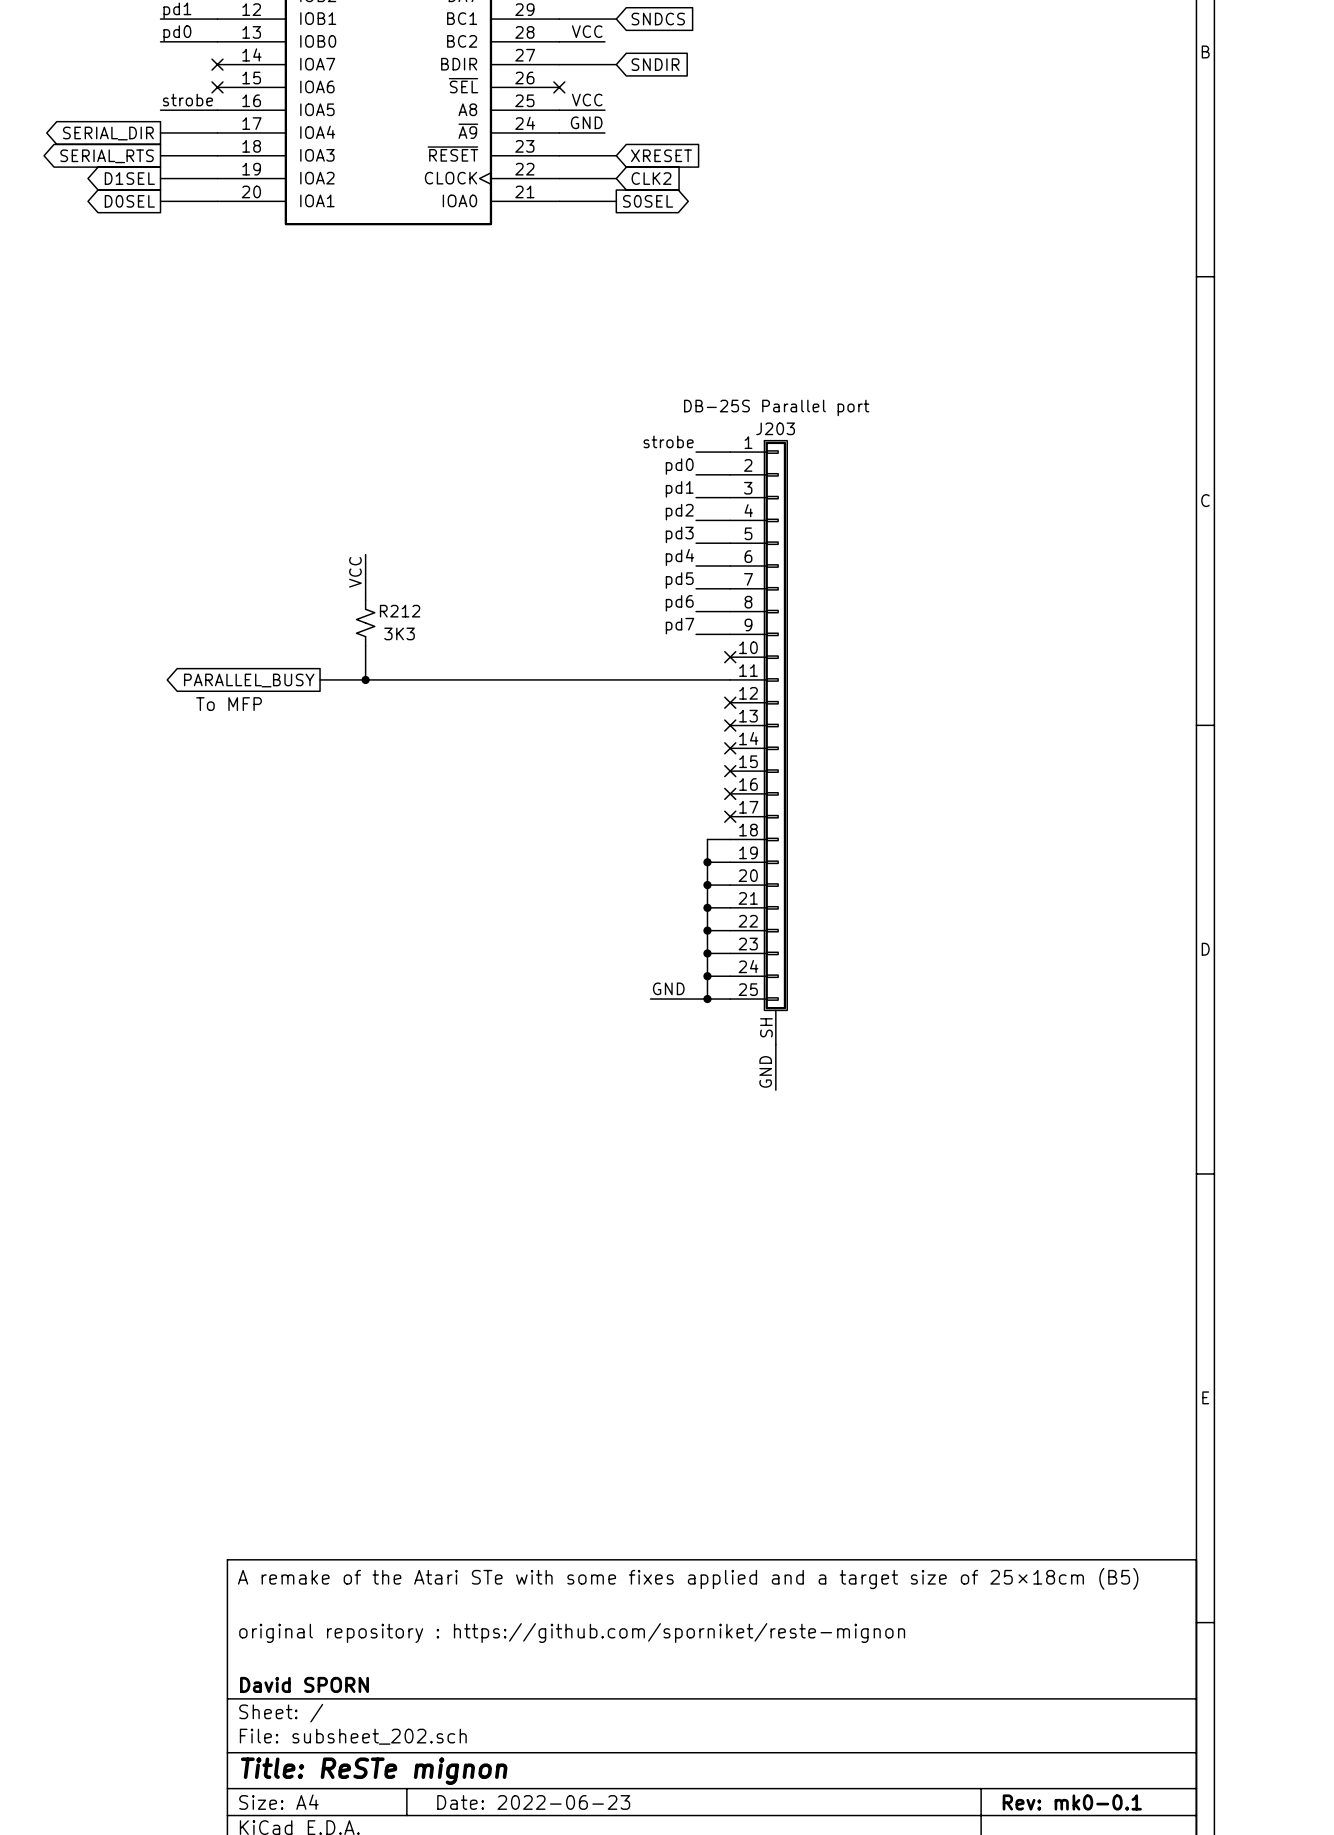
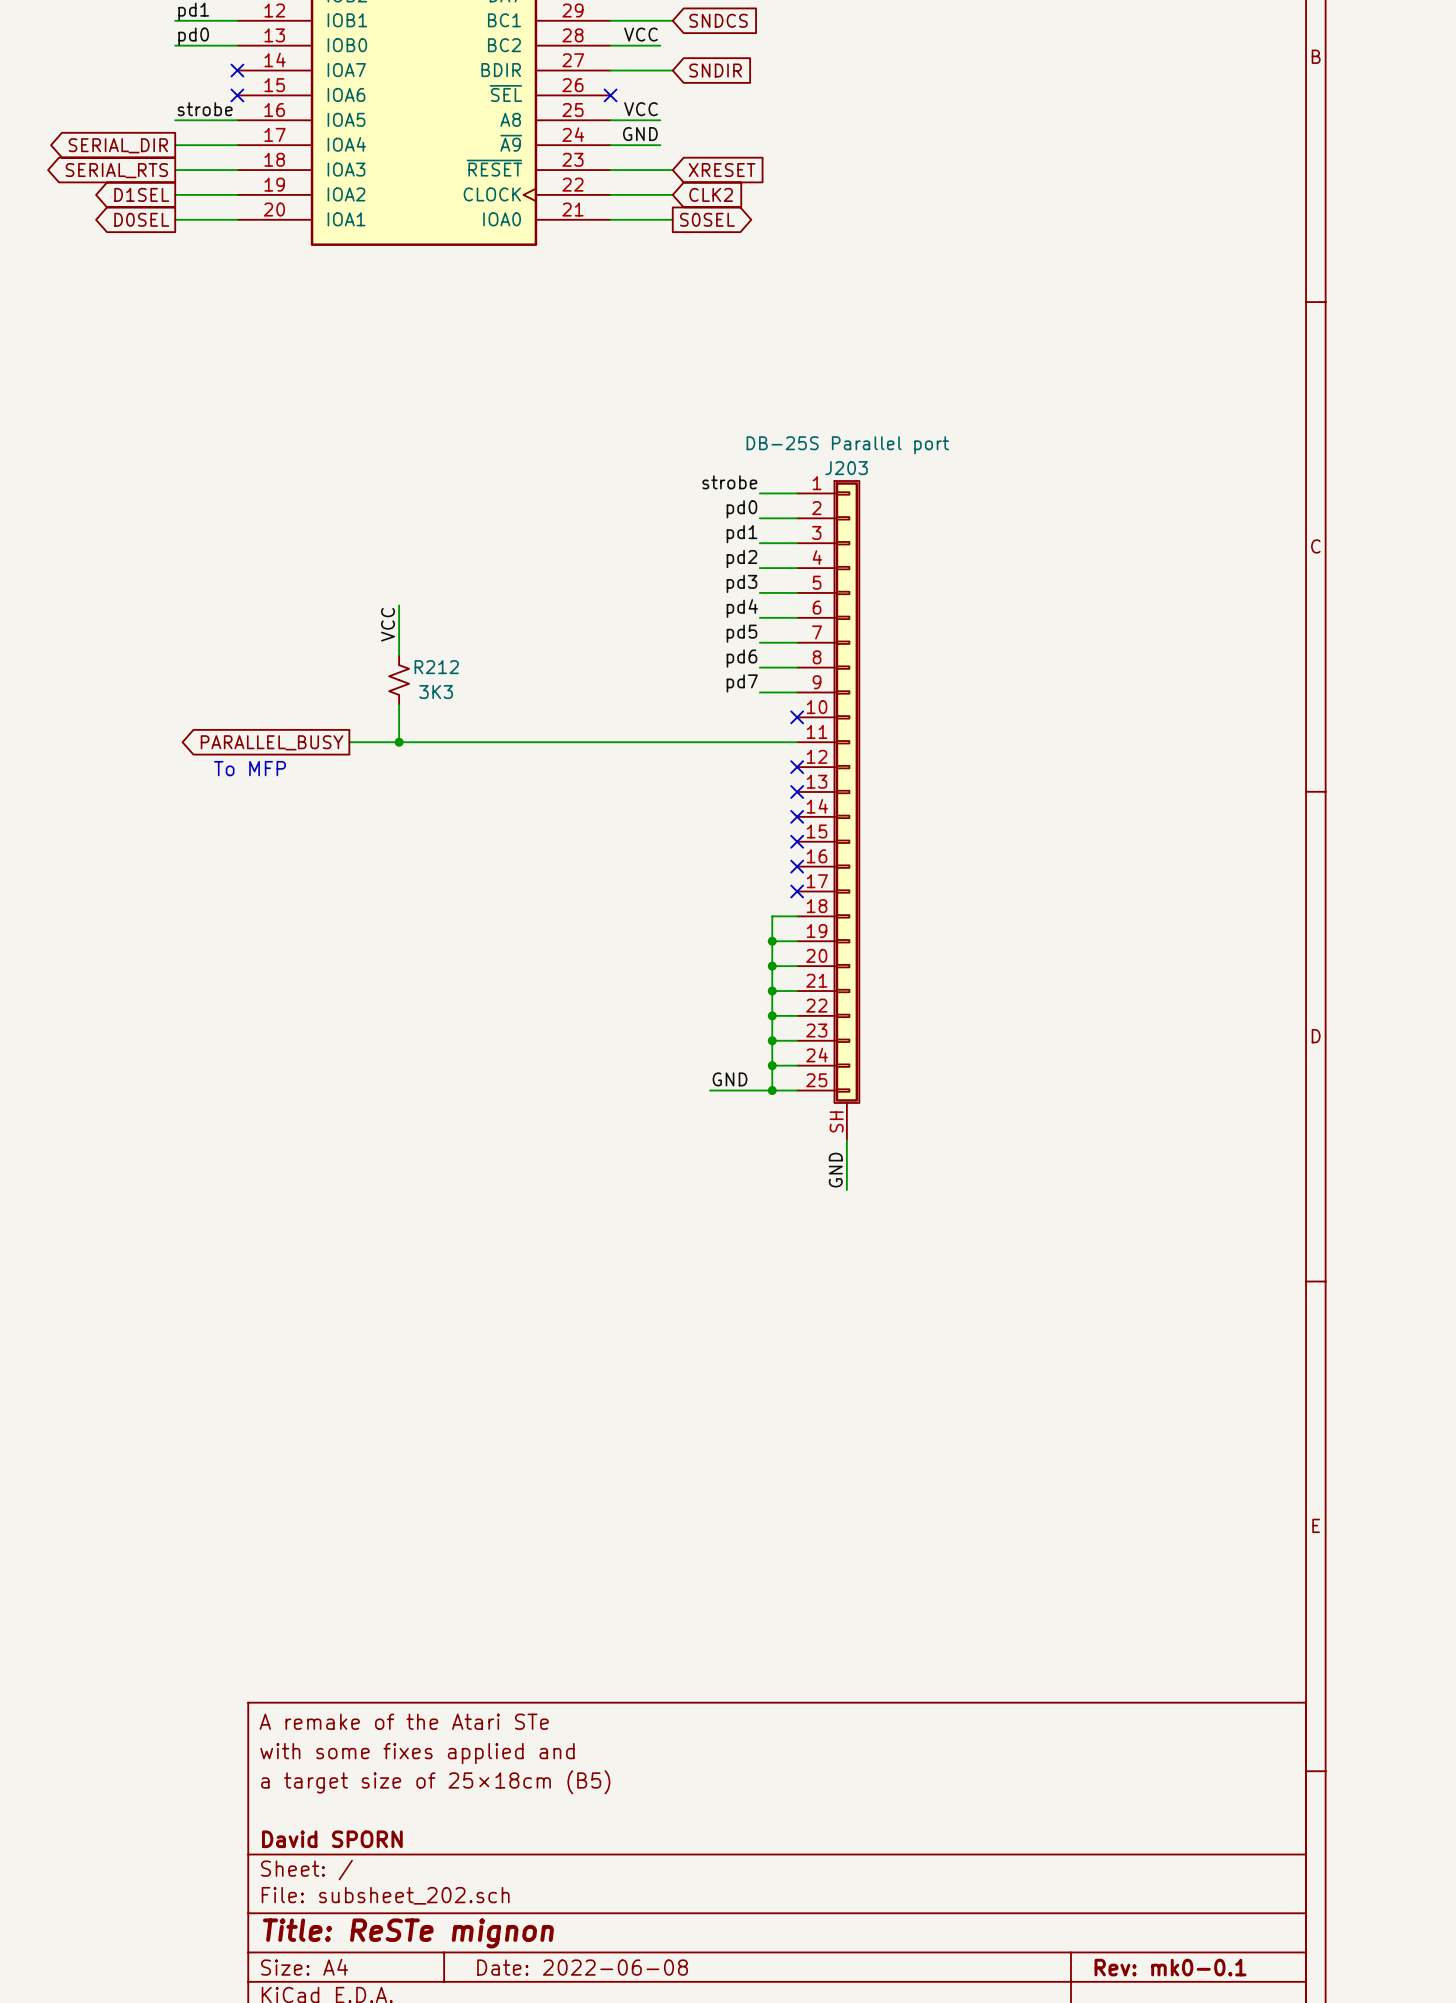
title block: A remake of the Atari STe with some fixes applied and a target size of 25×18cm (B5) (688, 1578) -> A remake of the Atari STe (404, 1721)
title block: none -> with some fixes applied and (417, 1753)
title block: original repository : https://github.com/sporniket/reste-mignon (572, 1633) -> a target size of 25×18cm (B5) (435, 1782)
title block: Date: 2022-06-23 (533, 1802) -> Date: 2022-06-08 (582, 1967)

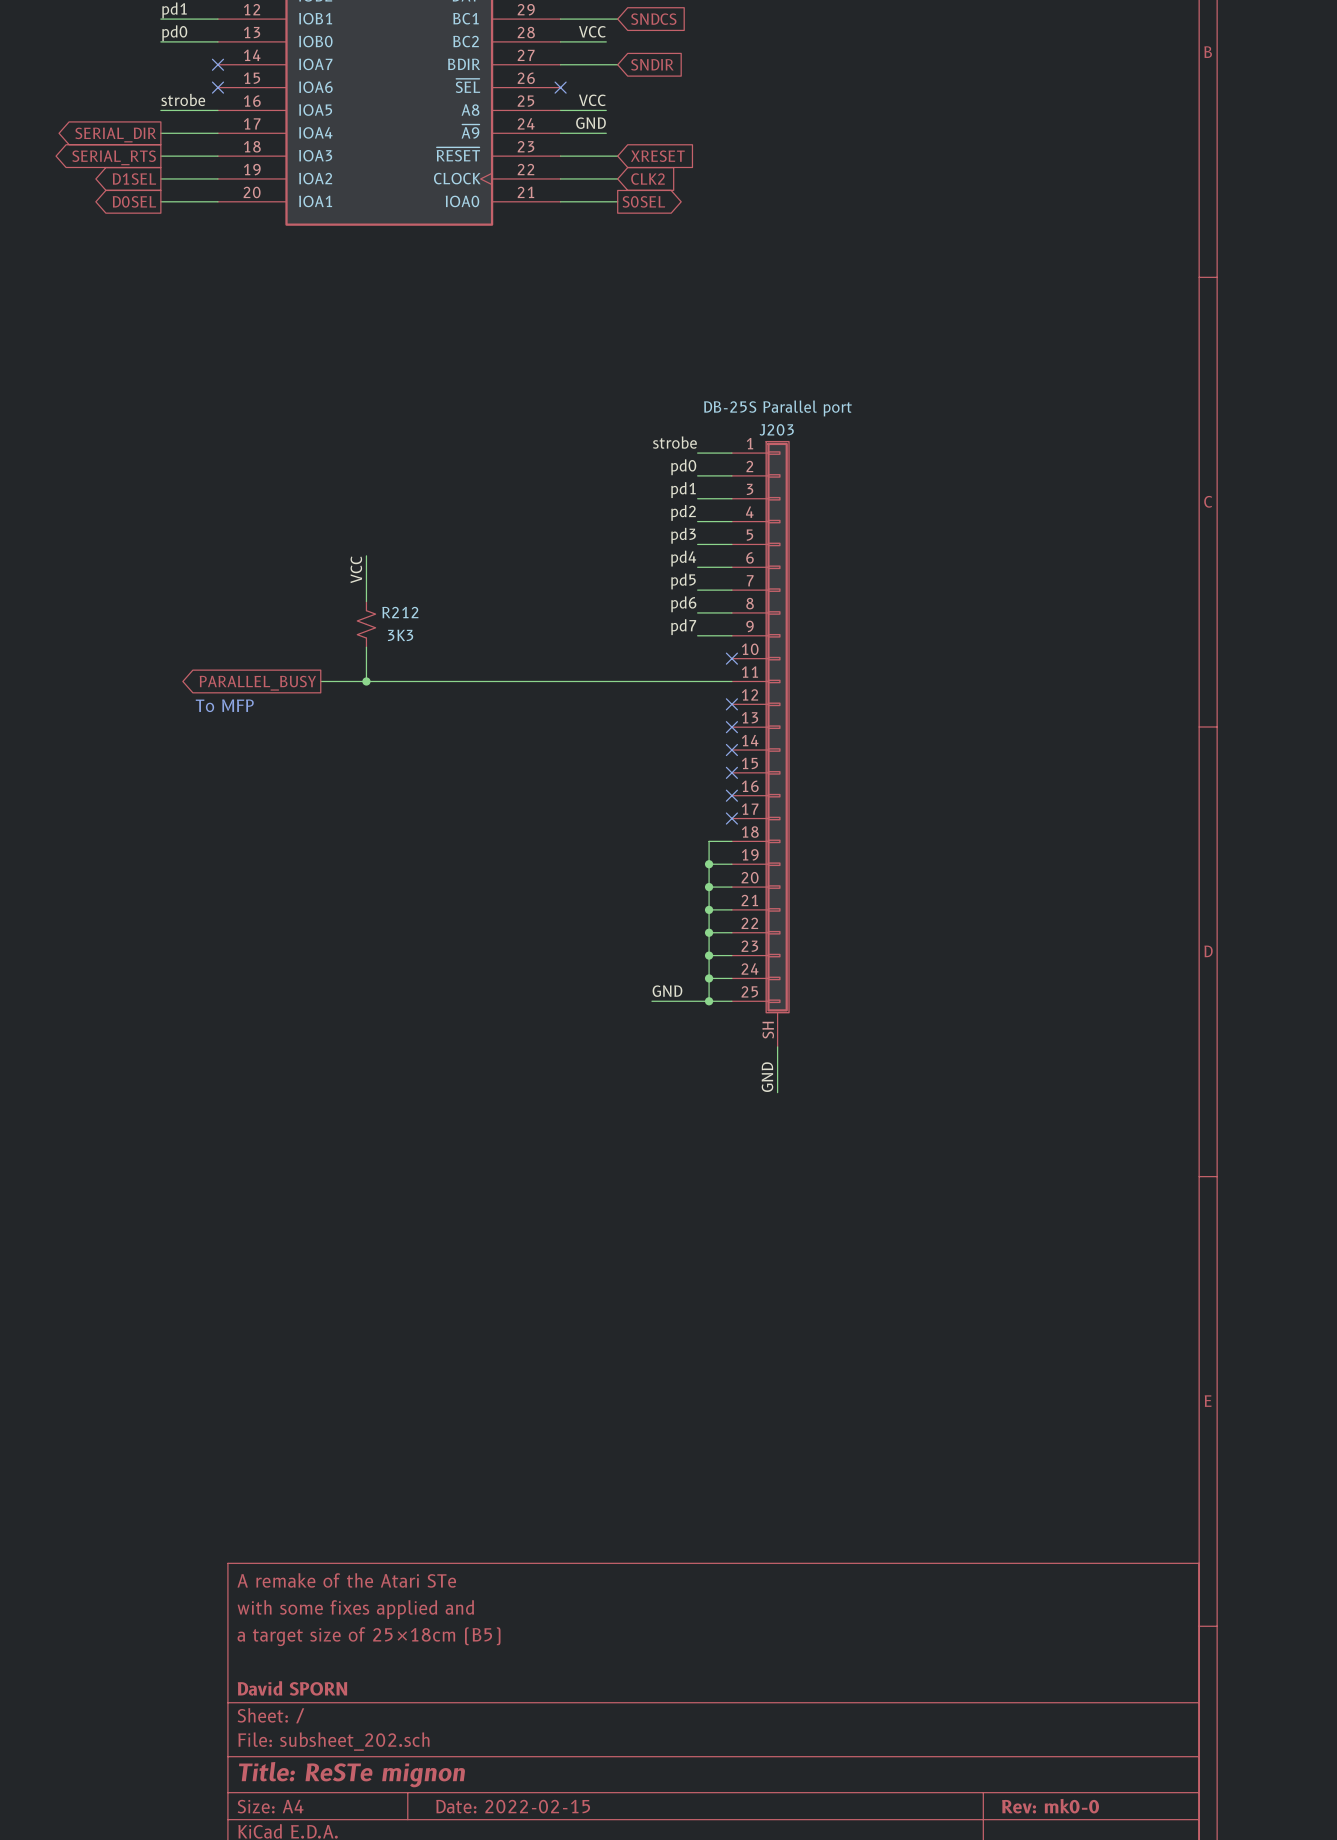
title block: Date: 2022-06-08 (582, 1967) -> Date: 2022-02-15 (513, 1806)
title block: Rev: mk0-0.1 (1170, 1967) -> Rev: mk0-0 (1050, 1806)

